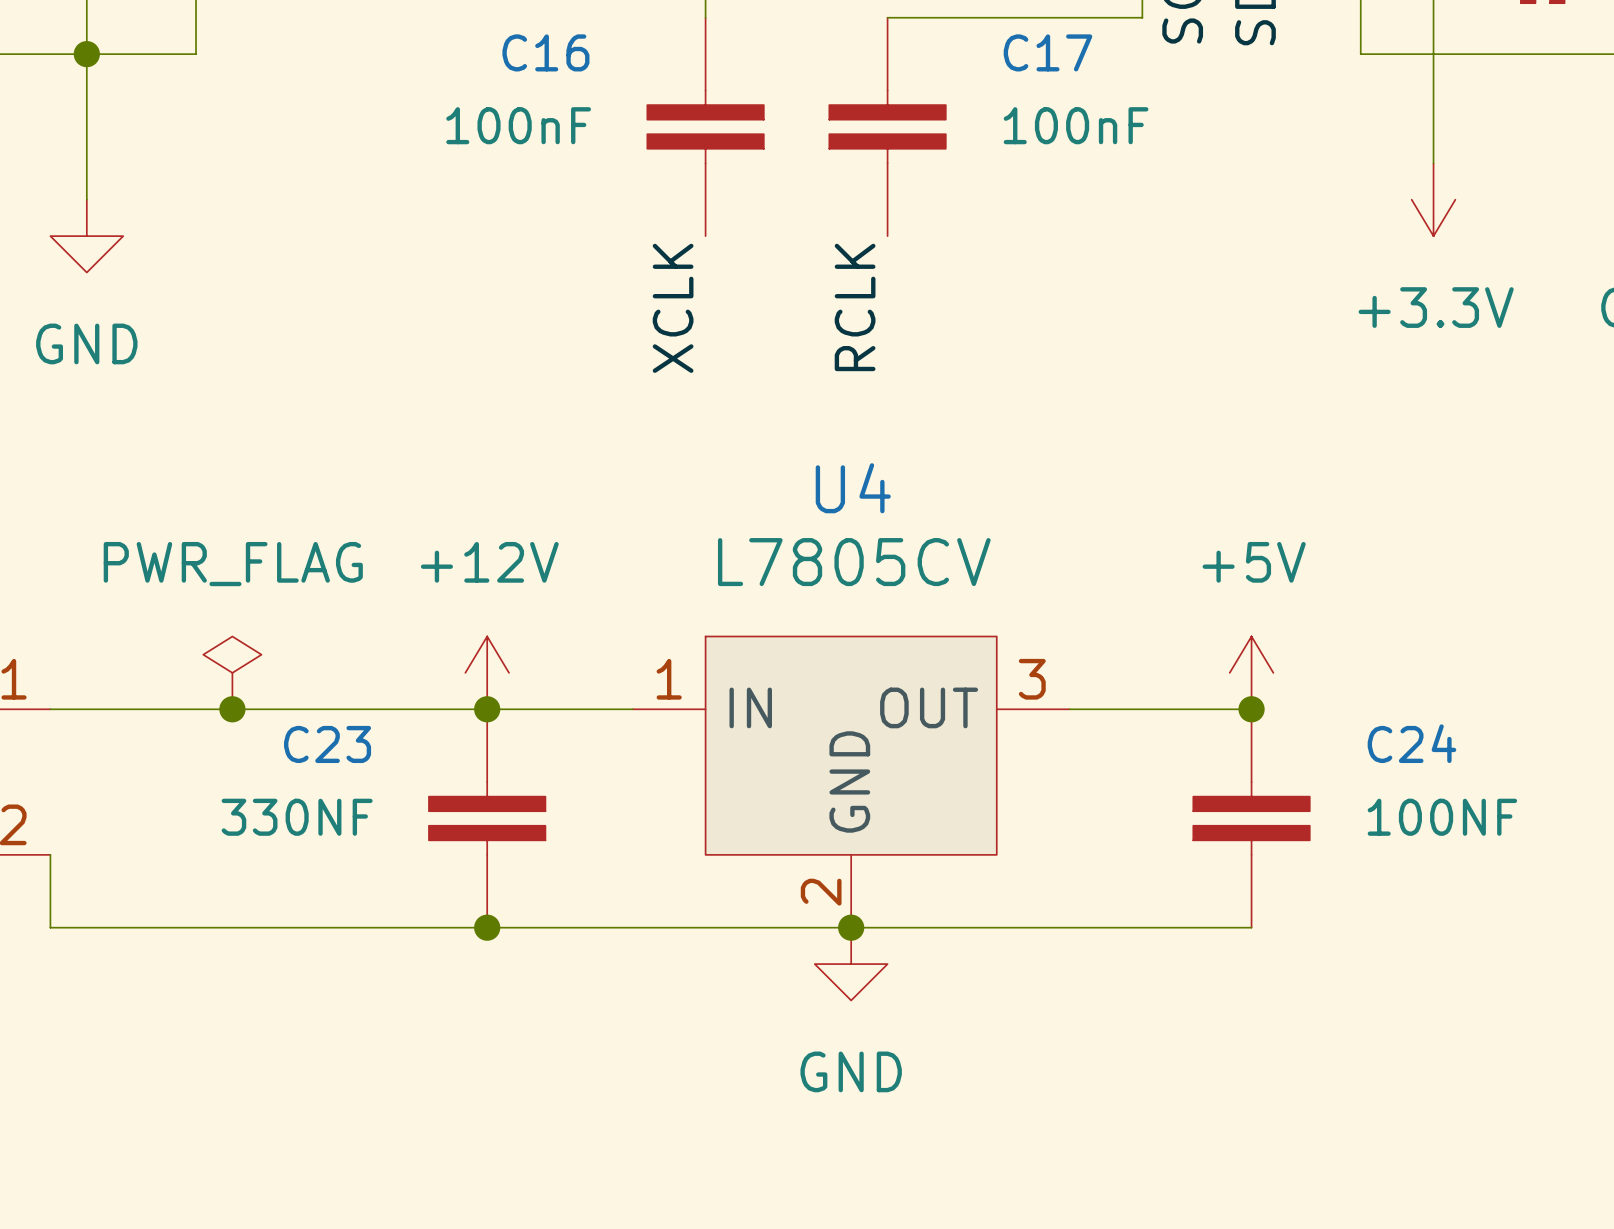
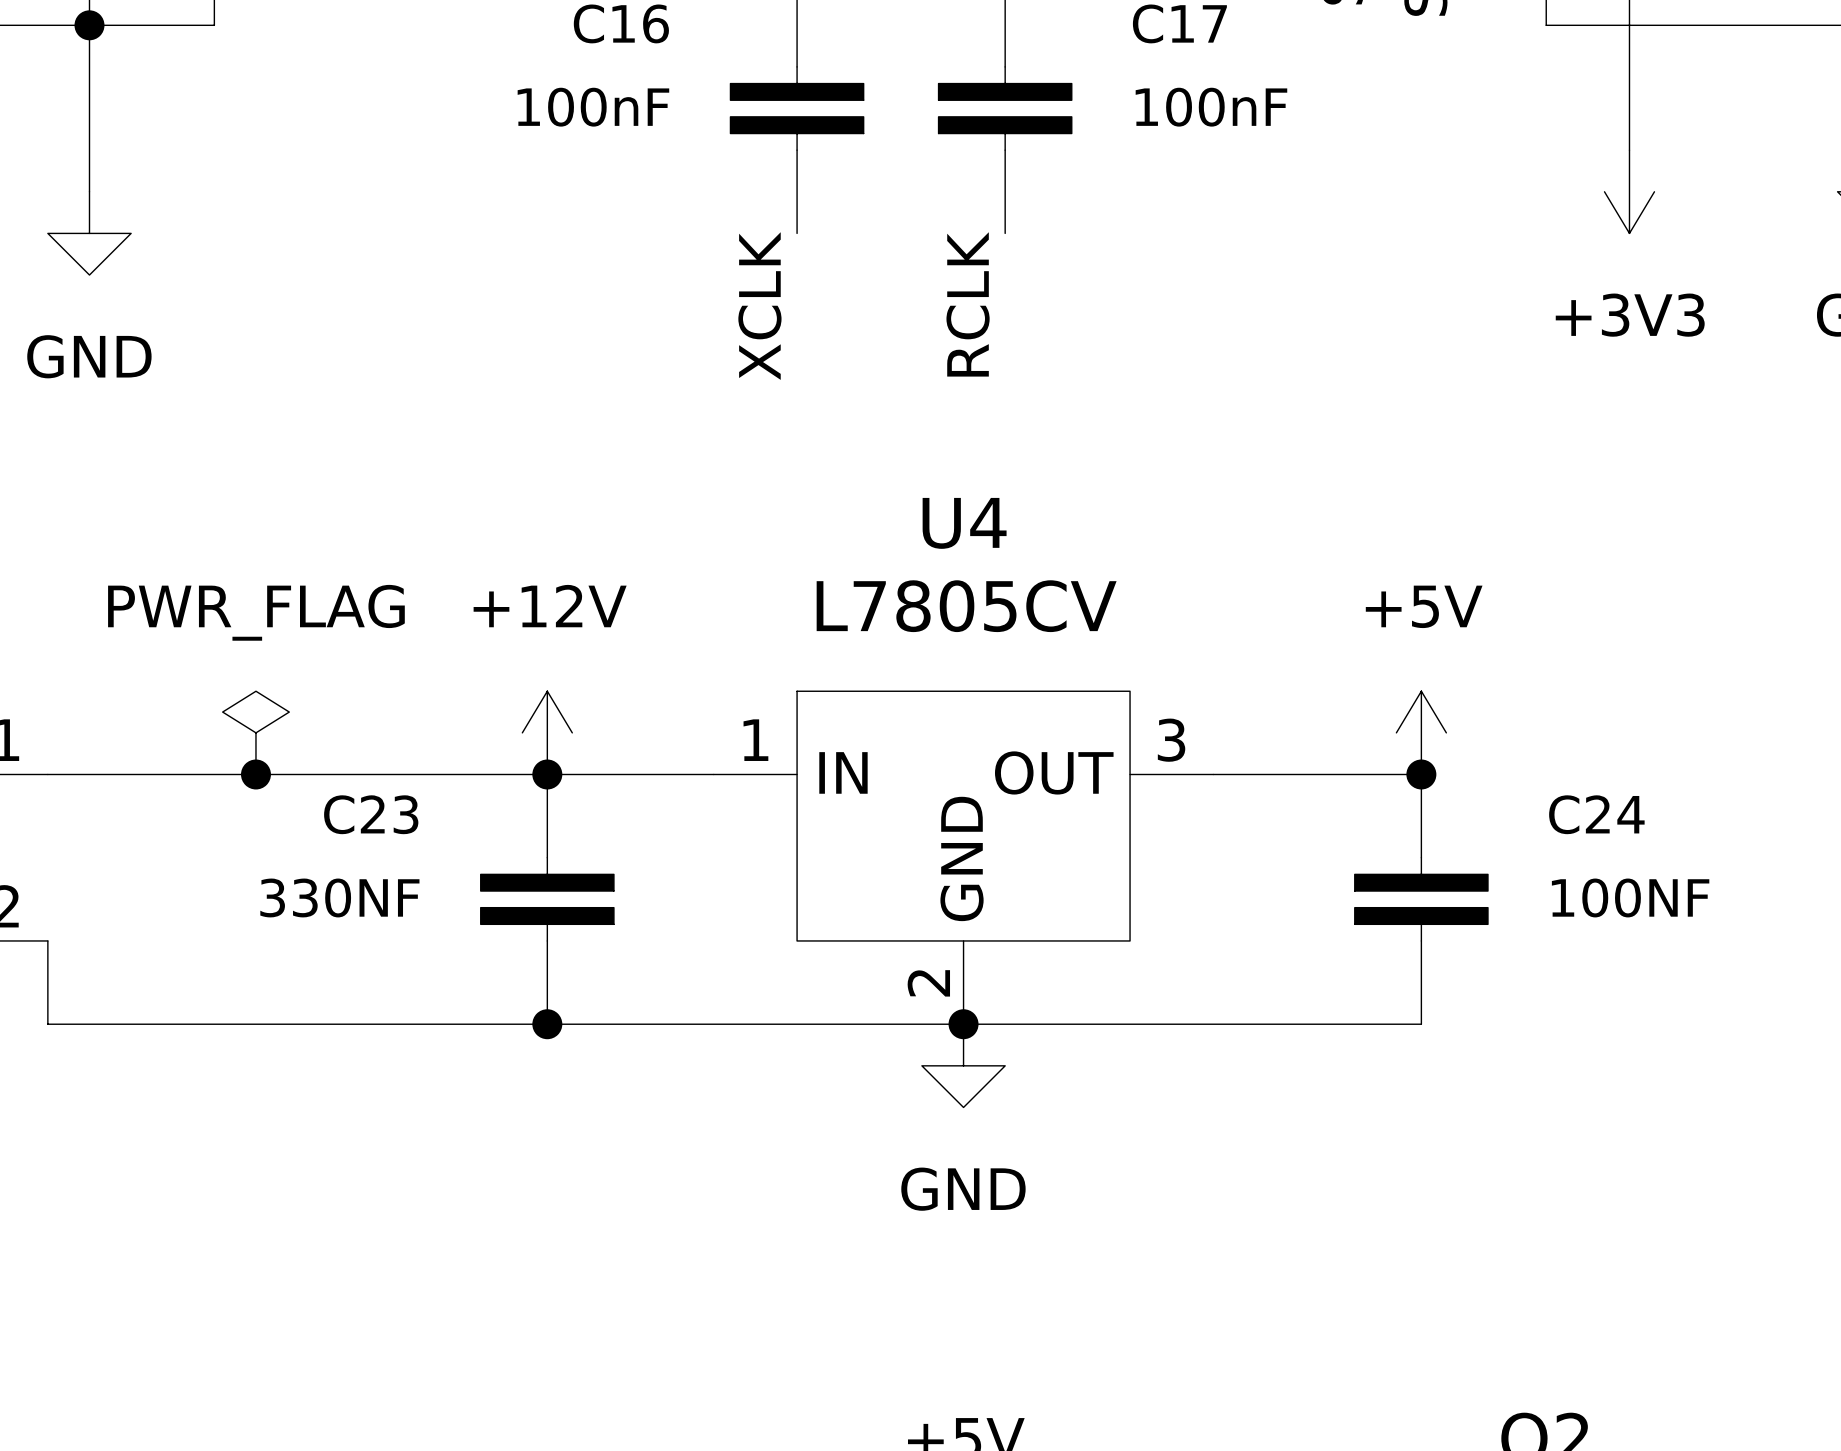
power symbol: +3.3V (1433, 199) -> +3V3 (1629, 191)

